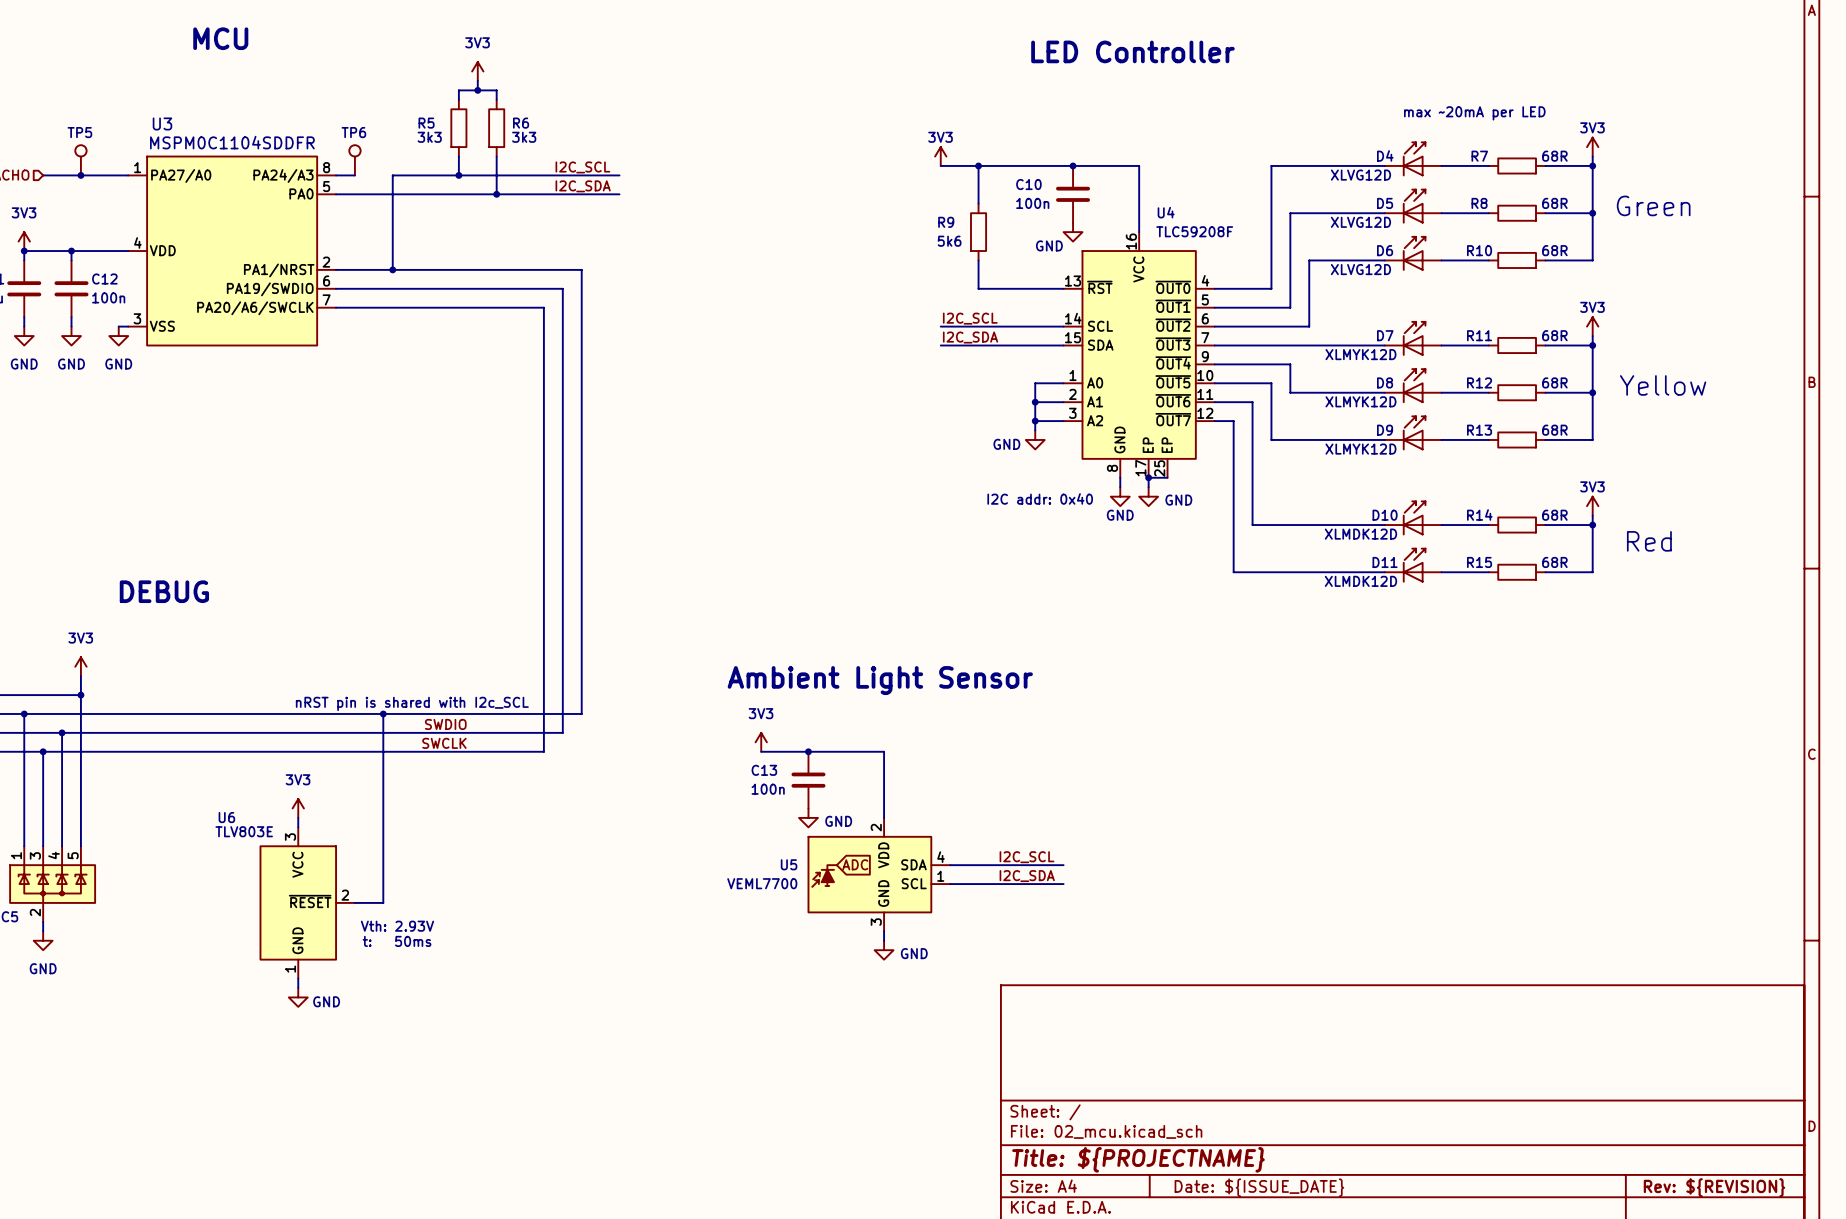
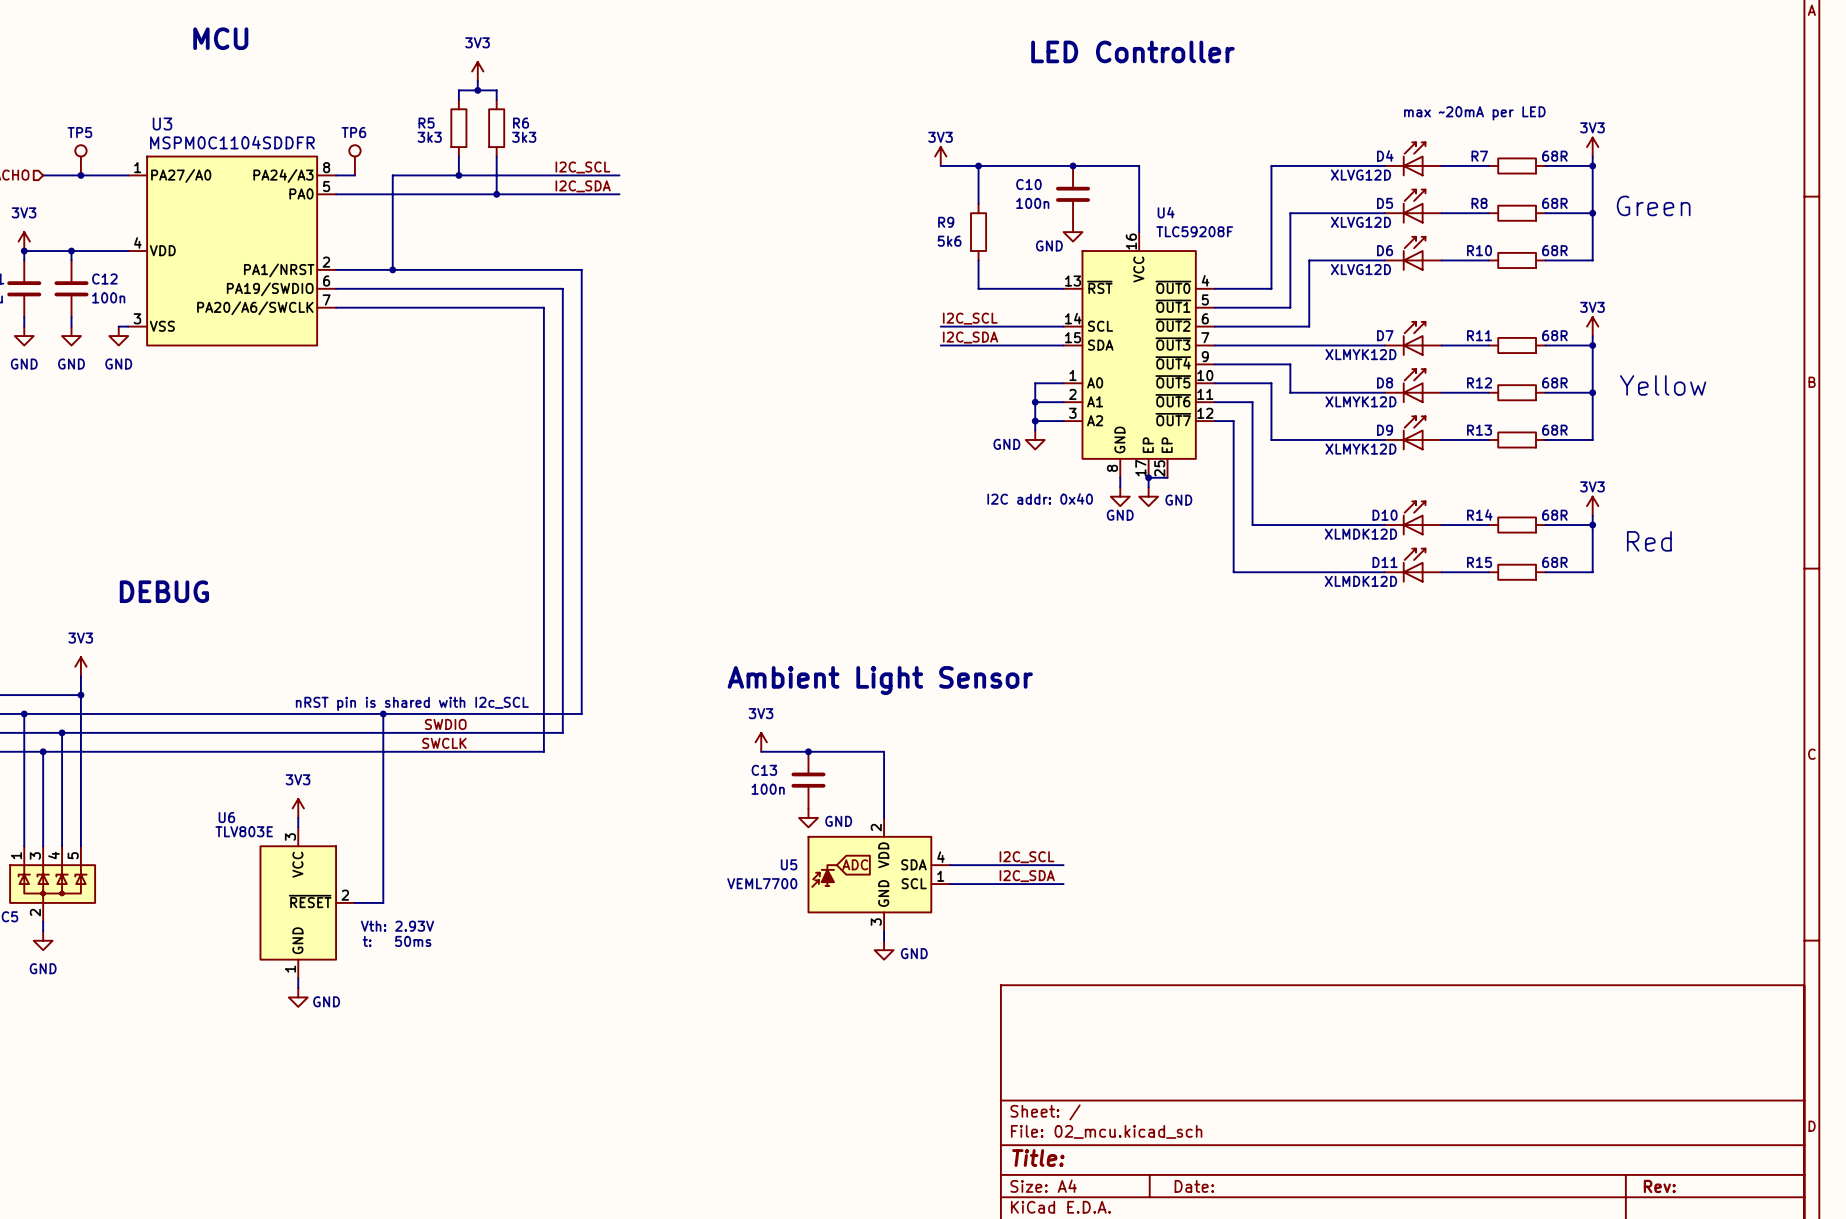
title block: Title: ${PROJECTNAME} (1138, 1159) -> Title: (1038, 1158)
title block: Date: ${ISSUE_DATE} (1259, 1187) -> Date: (1194, 1186)
title block: Rev: ${REVISION} (1714, 1187) -> Rev: (1659, 1186)

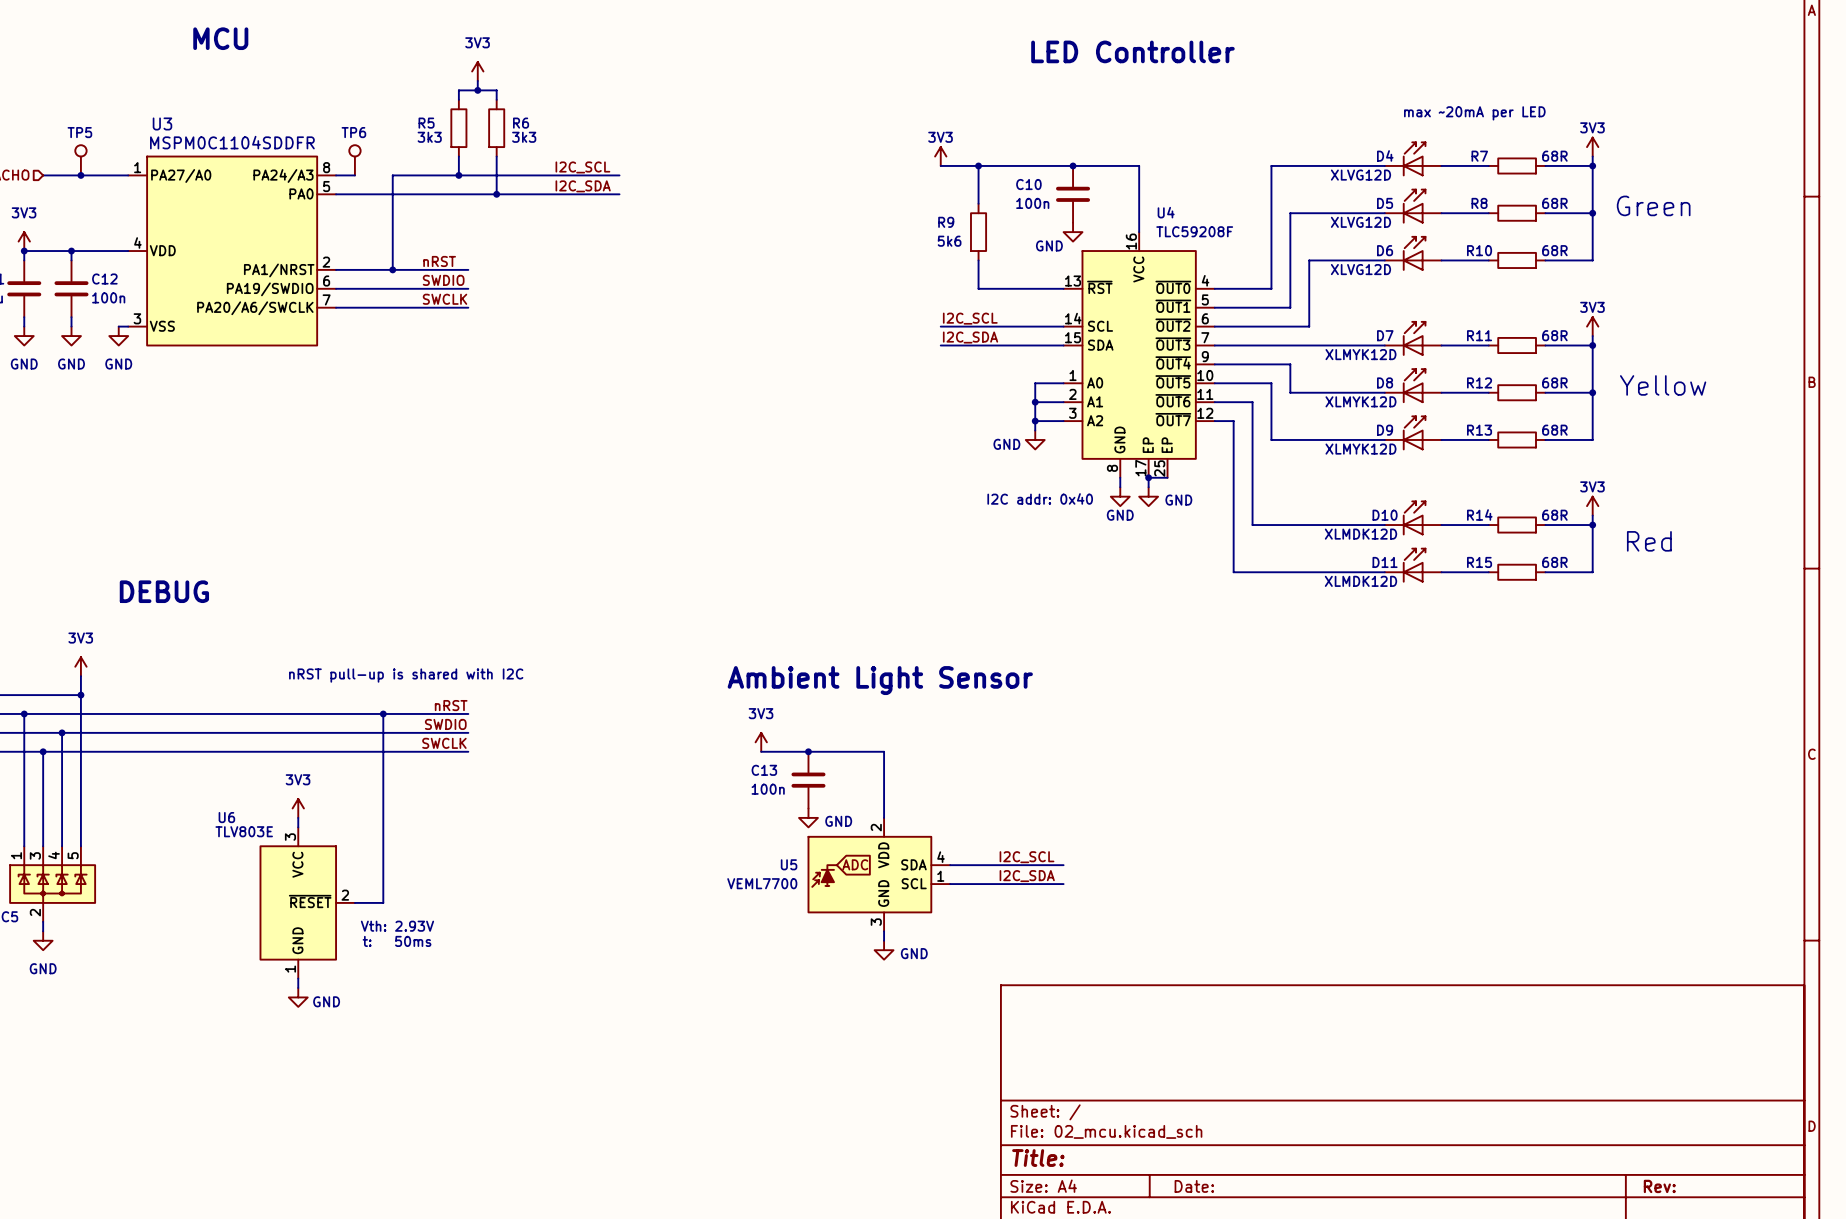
label: none -> nRST (439, 261)
wire: (468, 269) (581, 269) (581, 713) (468, 713) -> none
label: none -> SWDIO (443, 280)
wire: (468, 288) (562, 288) (562, 732) (468, 732) -> none
label: none -> SWCLK (445, 299)
wire: (468, 307) (543, 307) (543, 751) (468, 751) -> none
text: none -> nRST pull-up is shared with I2C (406, 675)
text: nRST pin is shared with I2c_SCL (412, 703) -> none
label: none -> nRST (451, 705)

